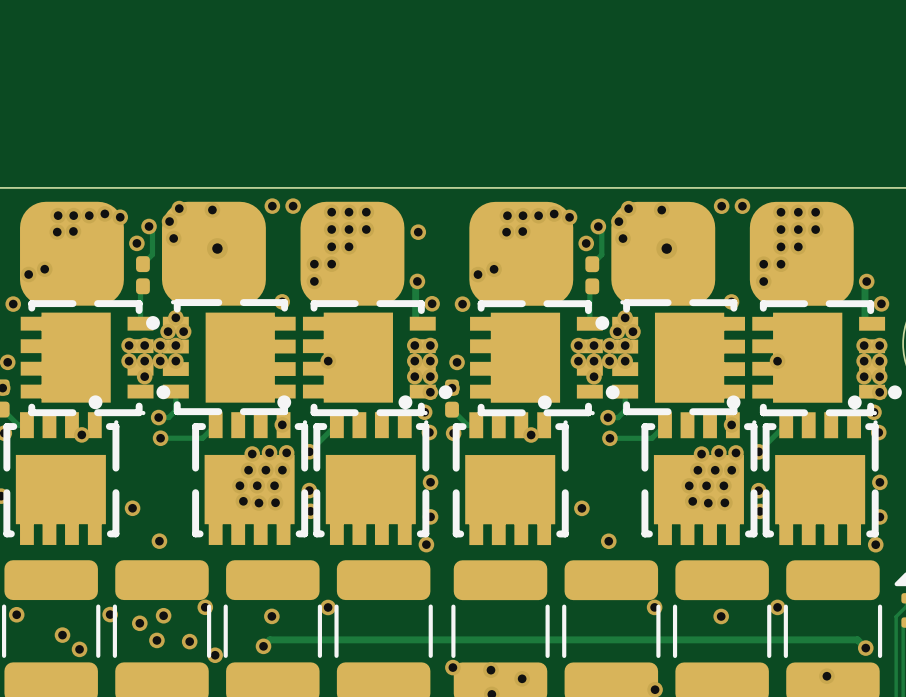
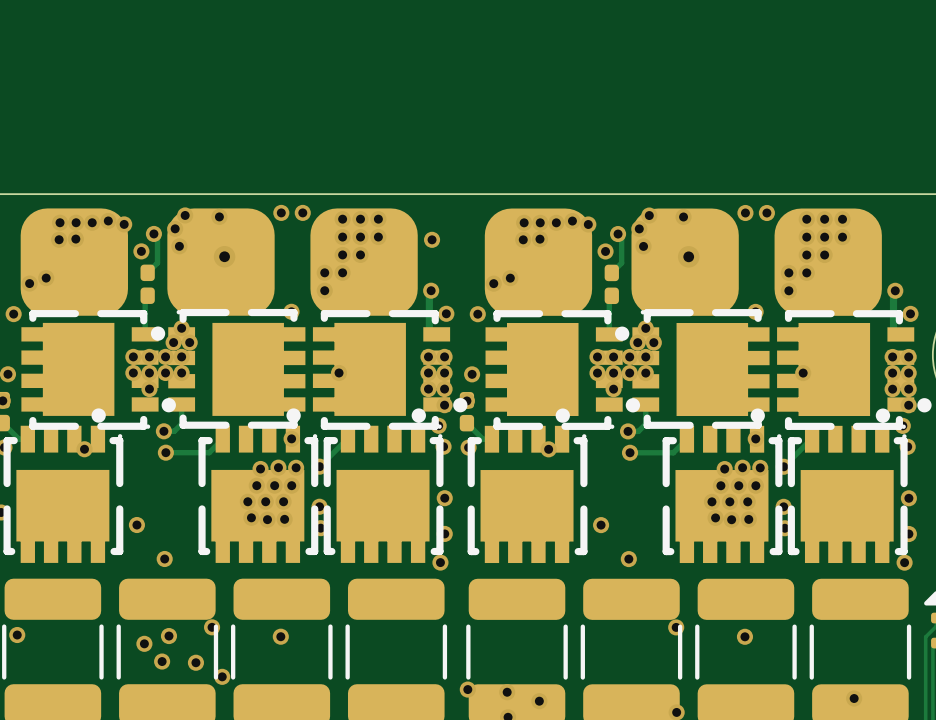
via: (328, 607) -> none
via: (777, 607) -> none
via: (110, 614) -> none
via: (62, 635) -> none
track: (263, 646) (269, 639) (857, 639) (865, 648) -> none
via: (263, 646) -> none
via: (865, 648) -> none
via: (79, 649) -> none

